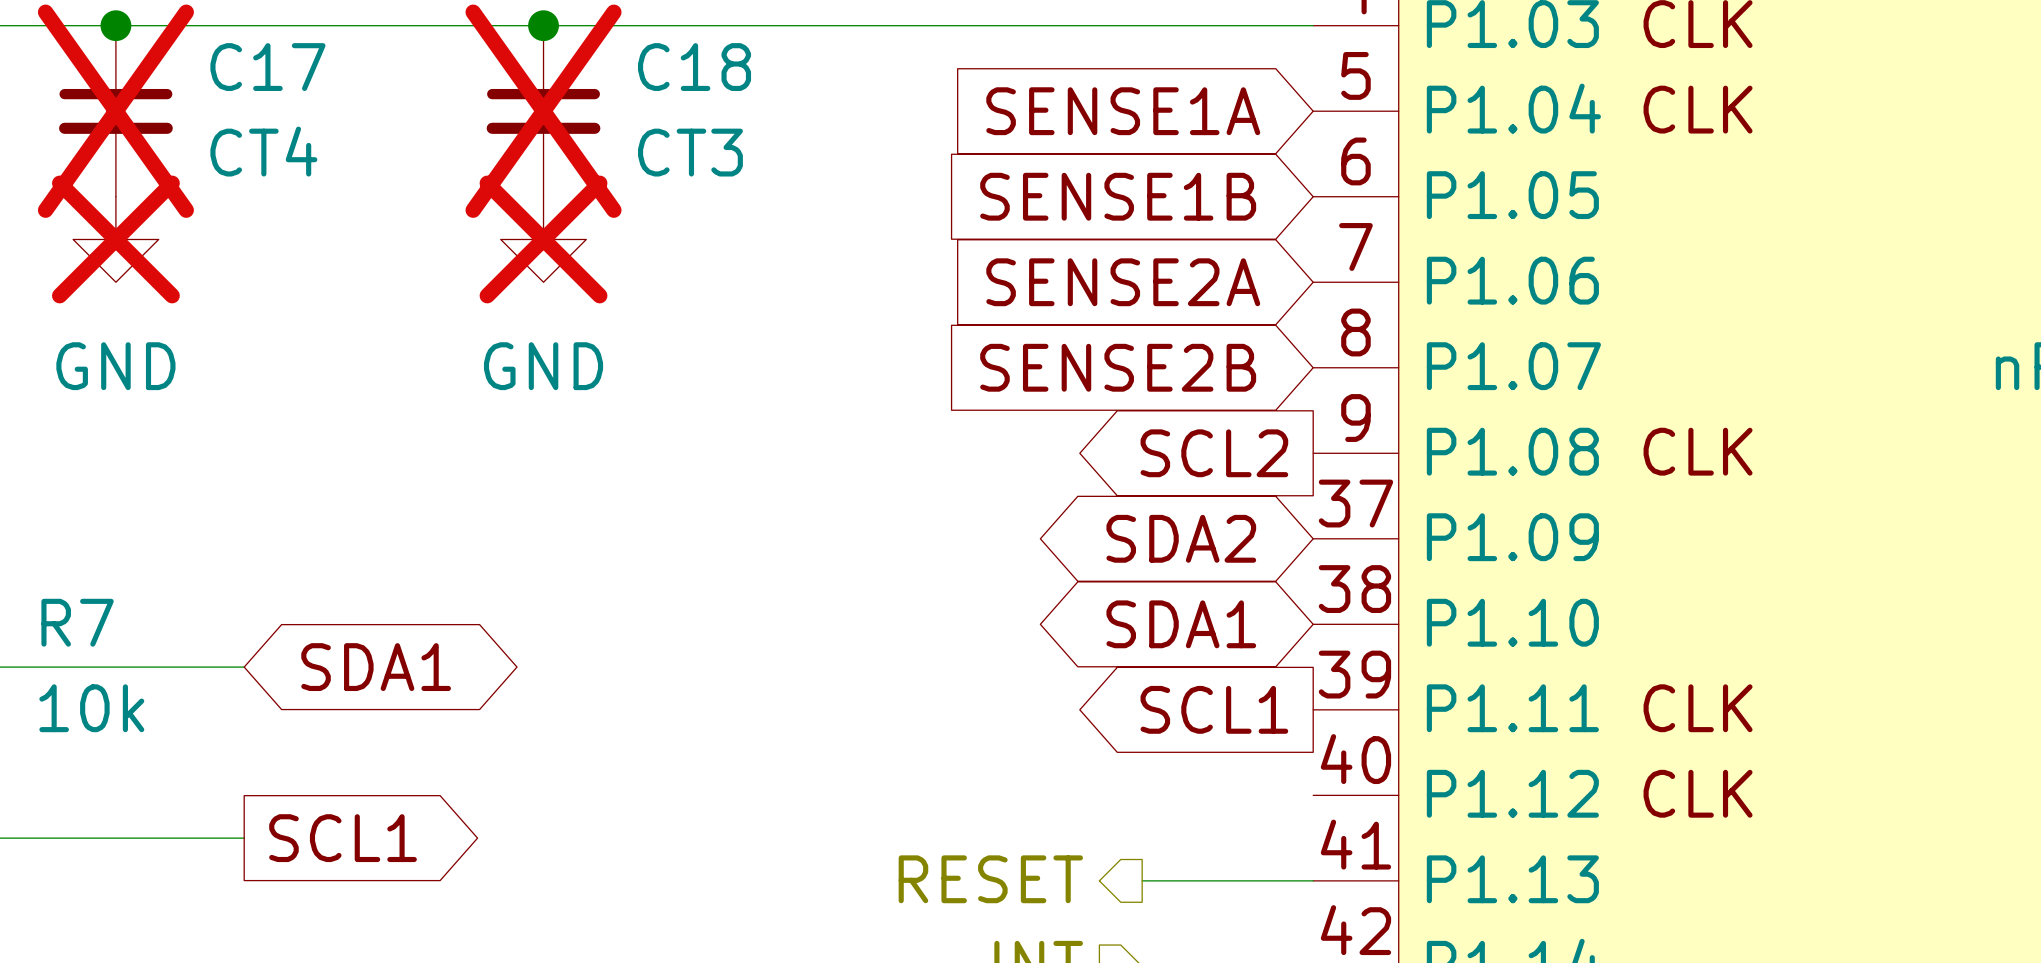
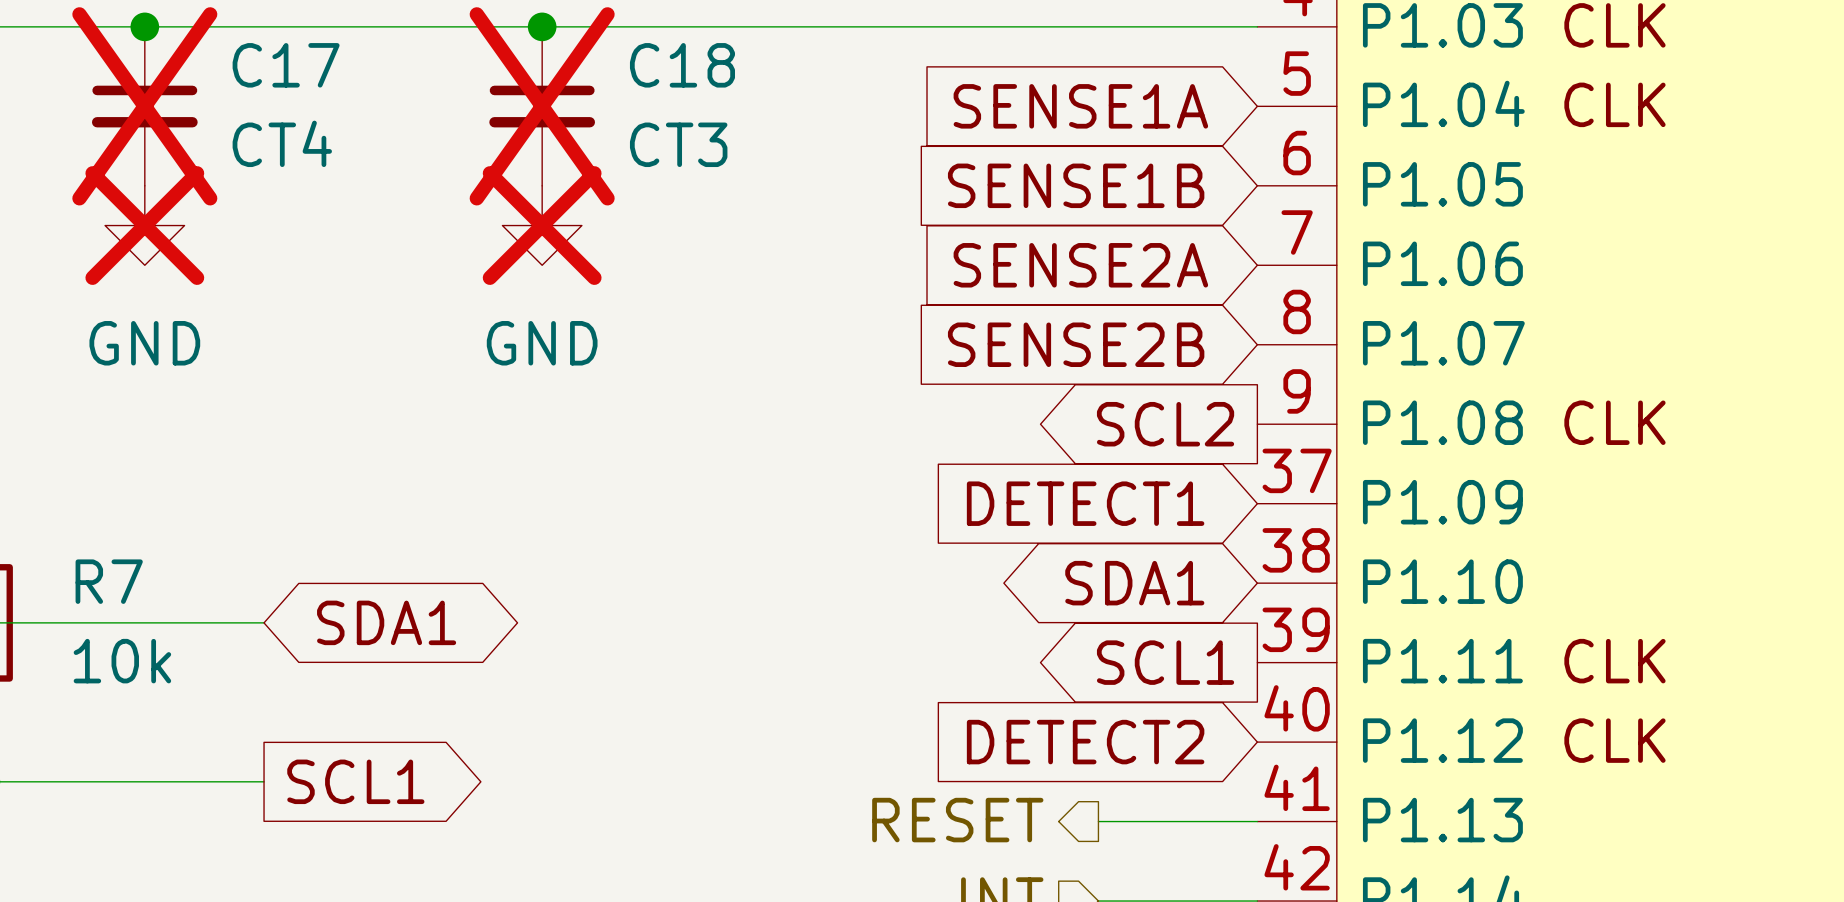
global label shape: bidirectional (1181, 538) -> input (1085, 503)
global label: SDA2 (1181, 538) -> DETECT1 (1085, 503)
global label: none -> DETECT2 (1085, 742)

